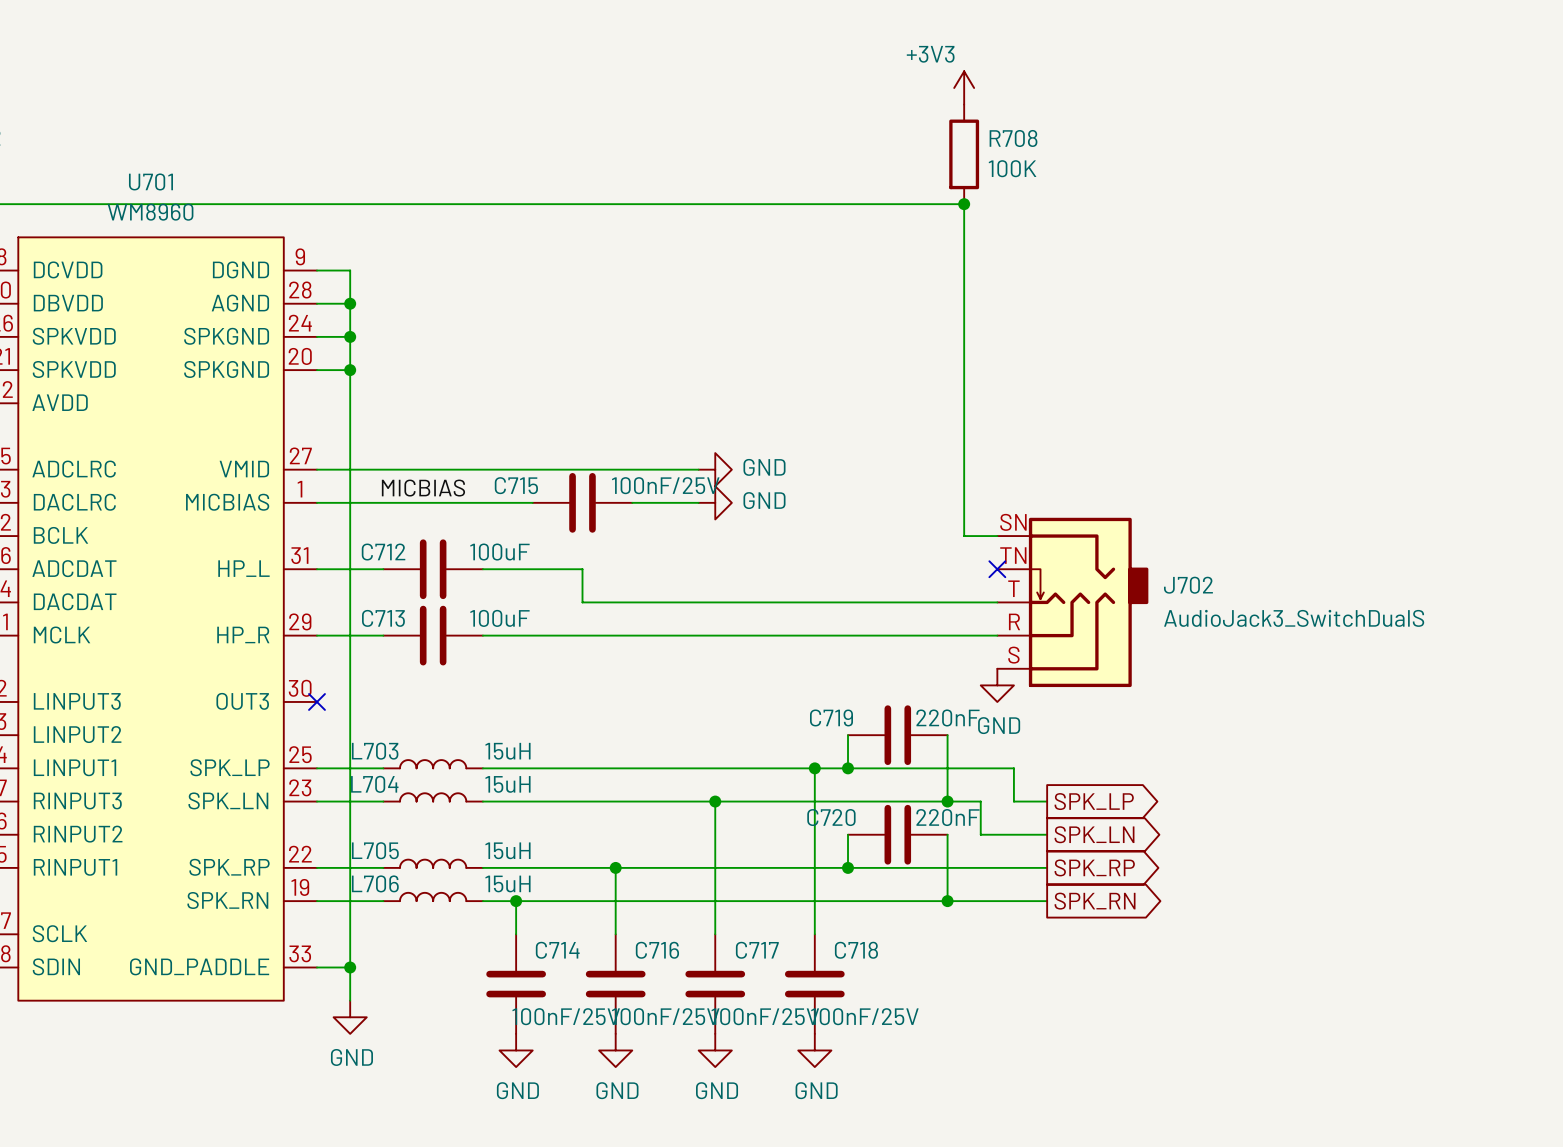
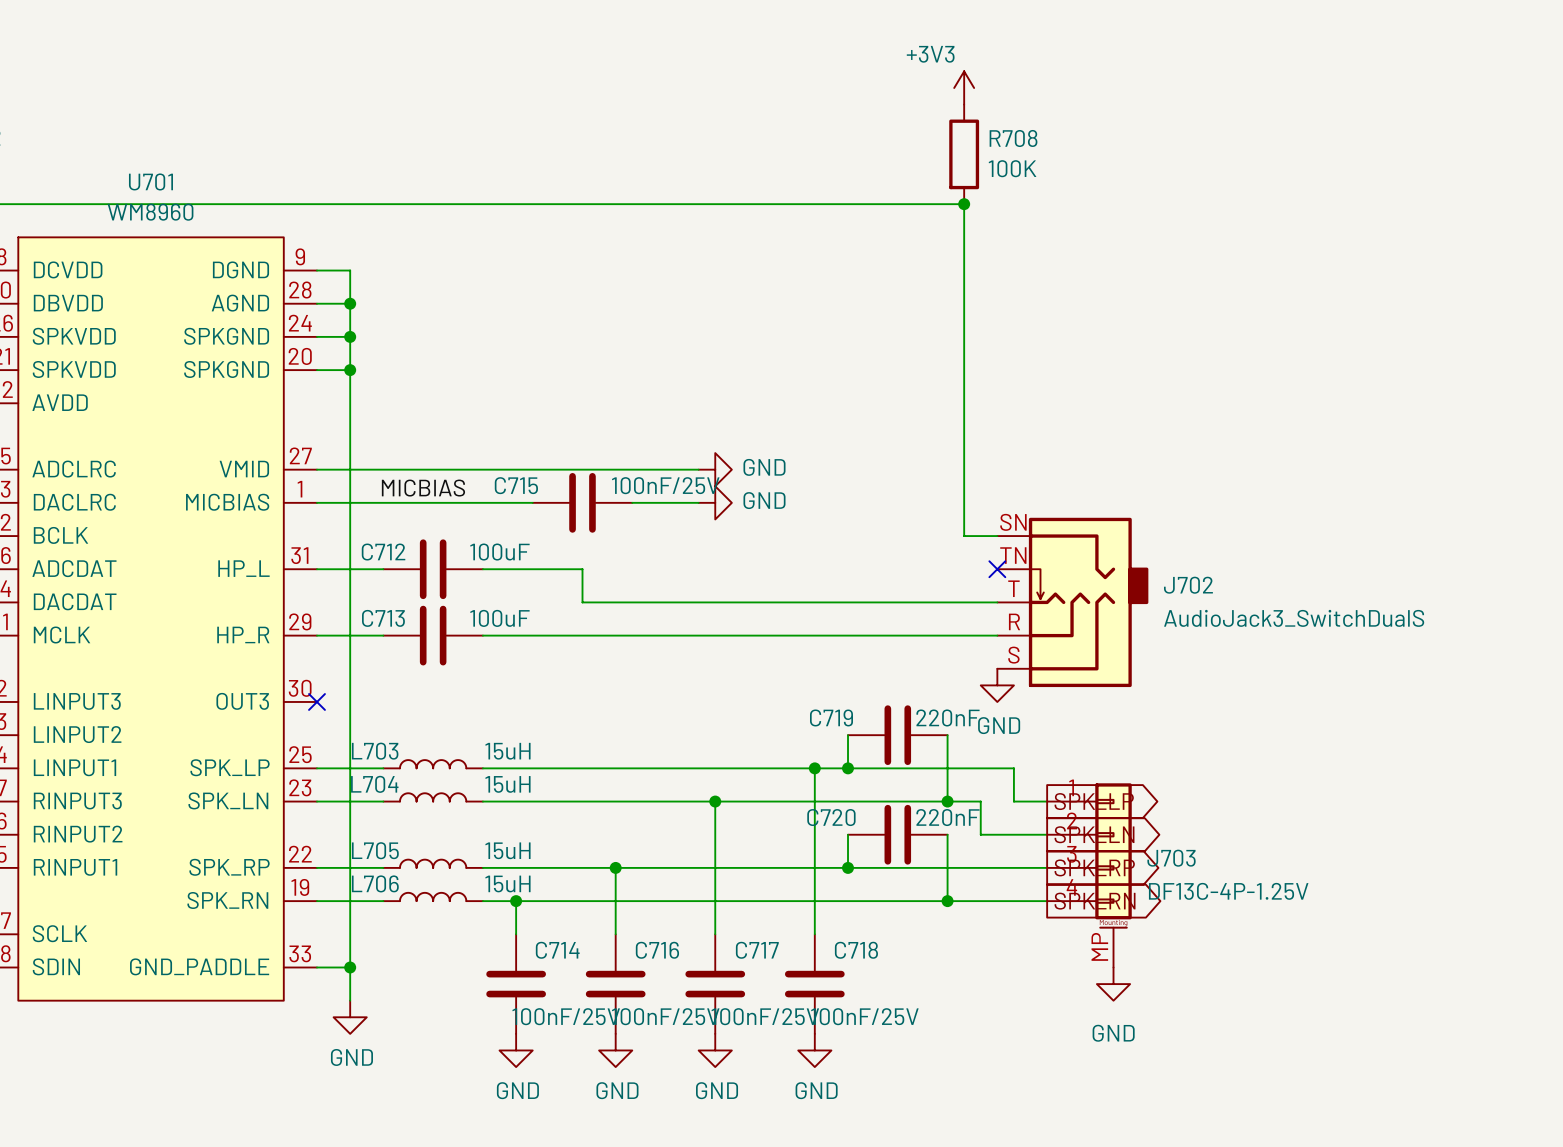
J703: none -> DF13C-4P-1.25V (1089, 875)
power symbol: none -> GND (1113, 984)

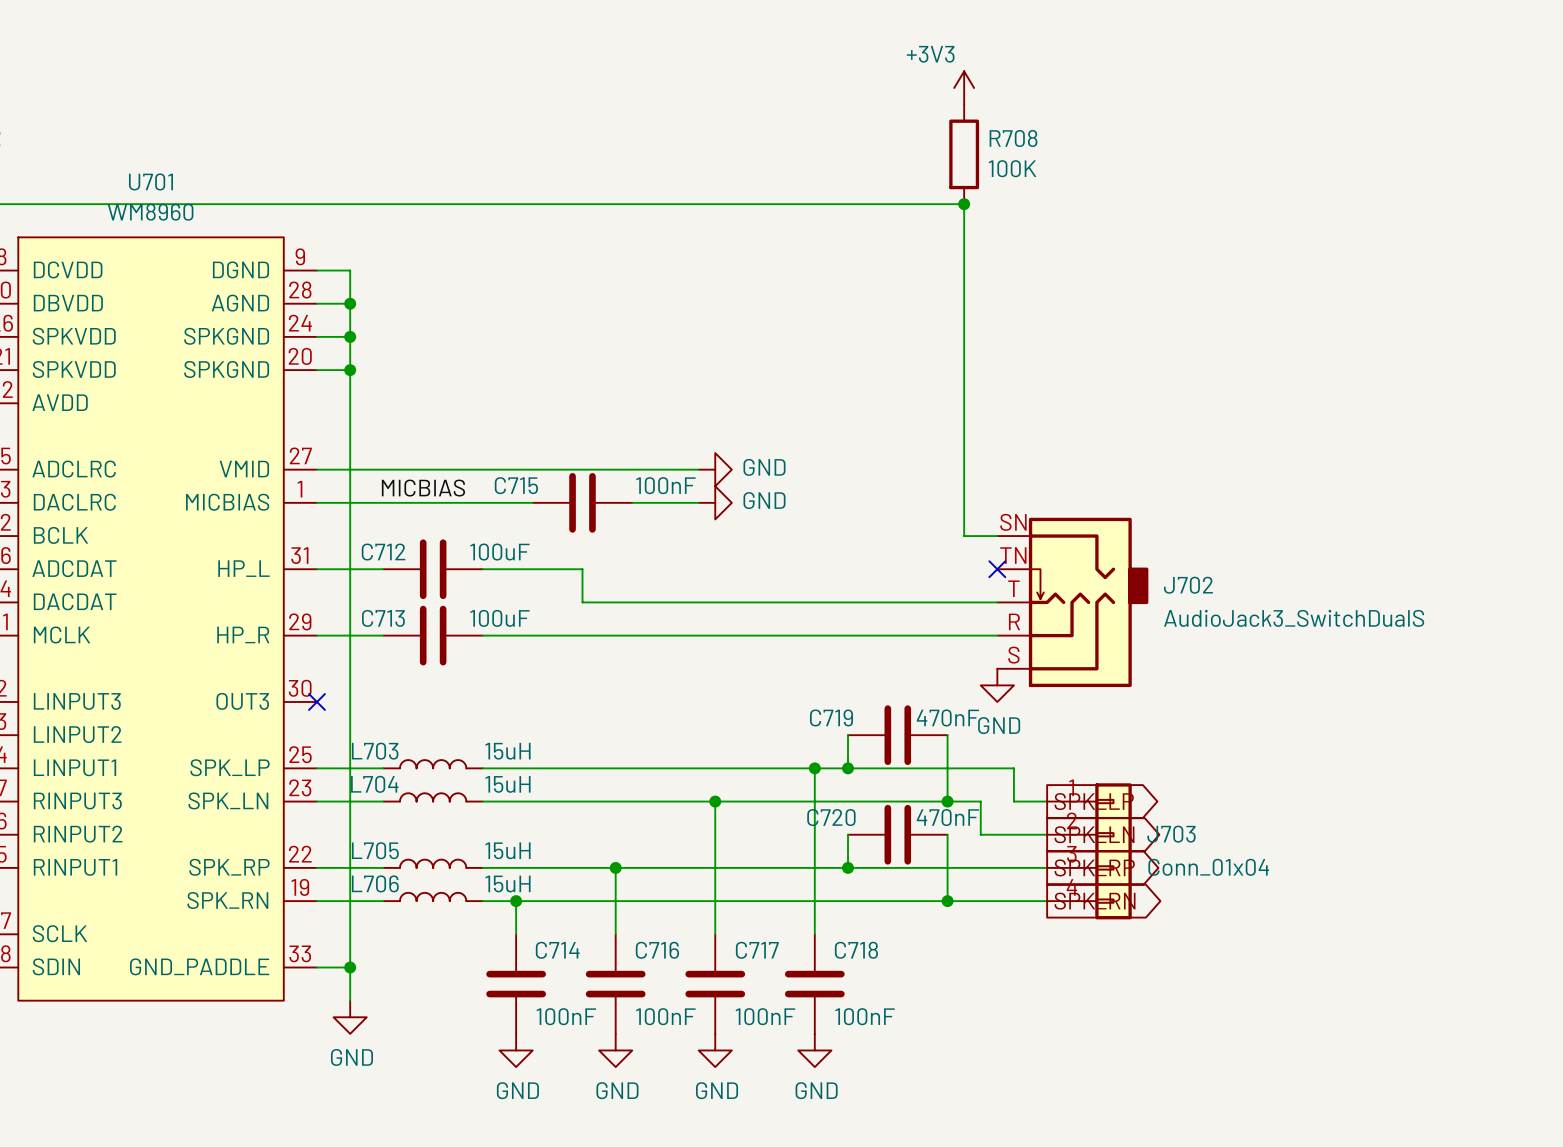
C715 value: 100nF/25V (665, 485) -> 100nF (665, 485)
C719 value: 220nF (947, 717) -> 470nF (947, 717)
J703 symbol: [1047, 783, 1132, 968] -> [1047, 783, 1132, 920]
C720 value: 220nF (947, 817) -> 470nF (947, 817)
J703 value: DF13C-4P-1.25V (1228, 891) -> Conn_01x04 (1208, 867)
power symbol: GND (1113, 984) -> none
C714 value: 100nF/25V (566, 1016) -> 100nF (566, 1016)
C716 value: 100nF/25V (665, 1016) -> 100nF (665, 1016)
C717 value: 100nF/25V (765, 1016) -> 100nF (765, 1016)
C718 value: 100nF/25V (864, 1016) -> 100nF (865, 1016)

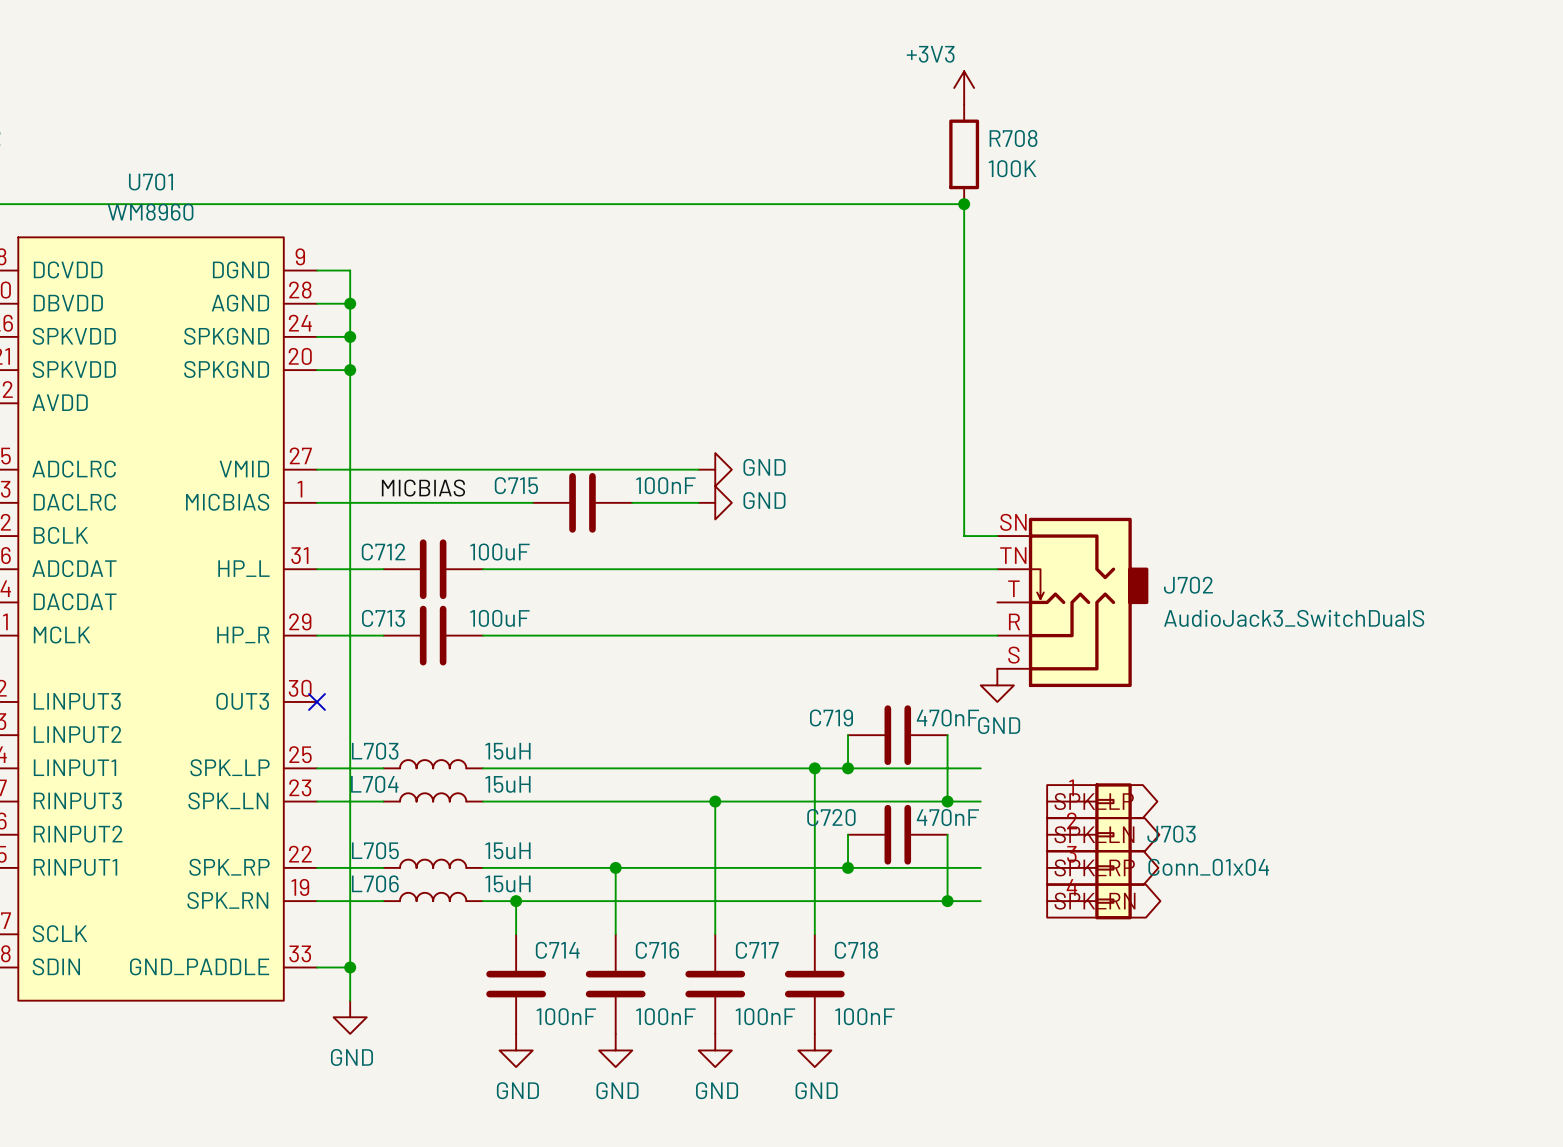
wire: (582, 569) (582, 602) (997, 602) -> (582, 569) (997, 569)
no-connect mark: (997, 569) -> none
wire: (980, 768) (1013, 768) (1013, 801) (1047, 801) -> none
wire: (980, 801) (980, 834) (1047, 834) -> none
wire: (980, 867) (1047, 867) -> none
wire: (980, 901) (1047, 901) -> none

